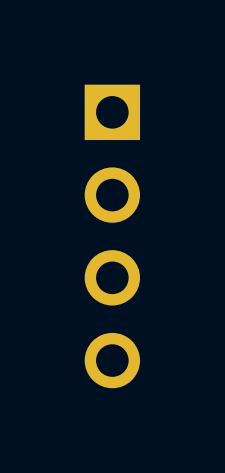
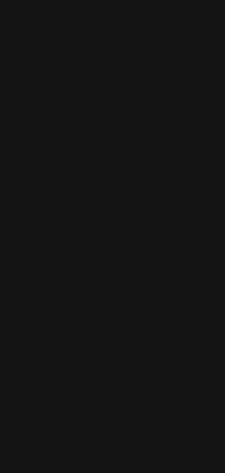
part: (112, 236) -> none

